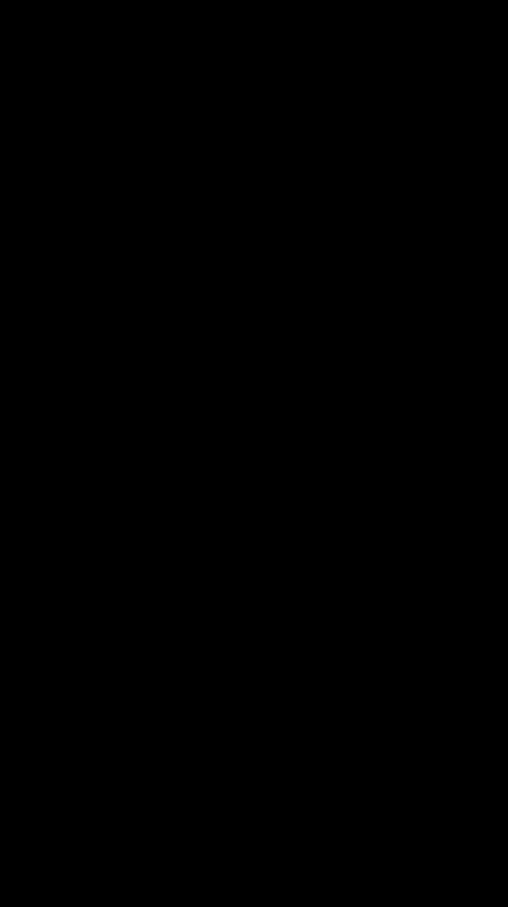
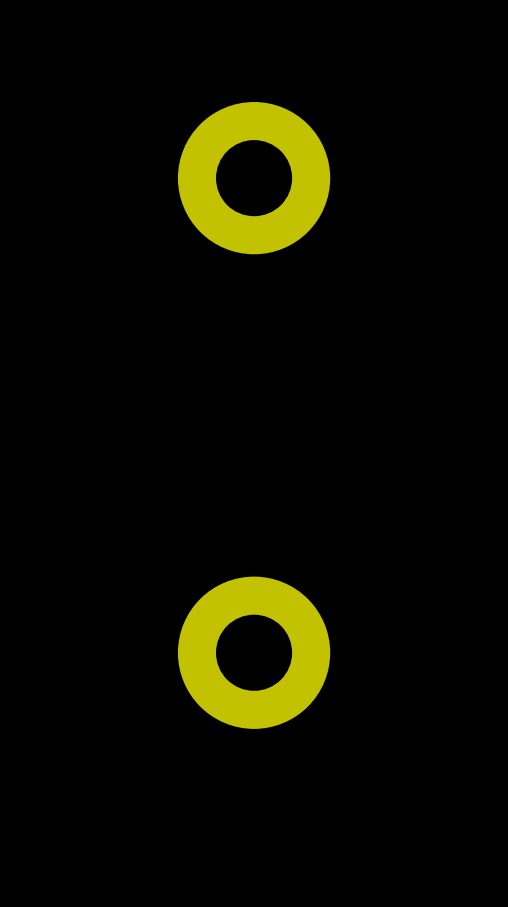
part: none -> (254, 178)
part: none -> (254, 652)

